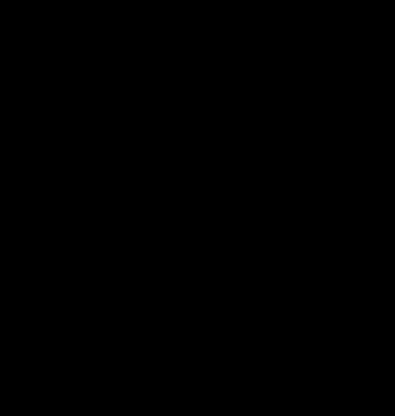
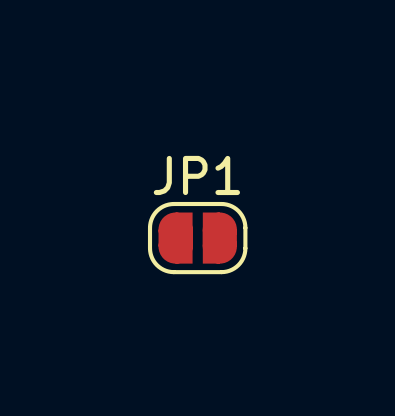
JP1: none -> (197, 238)

